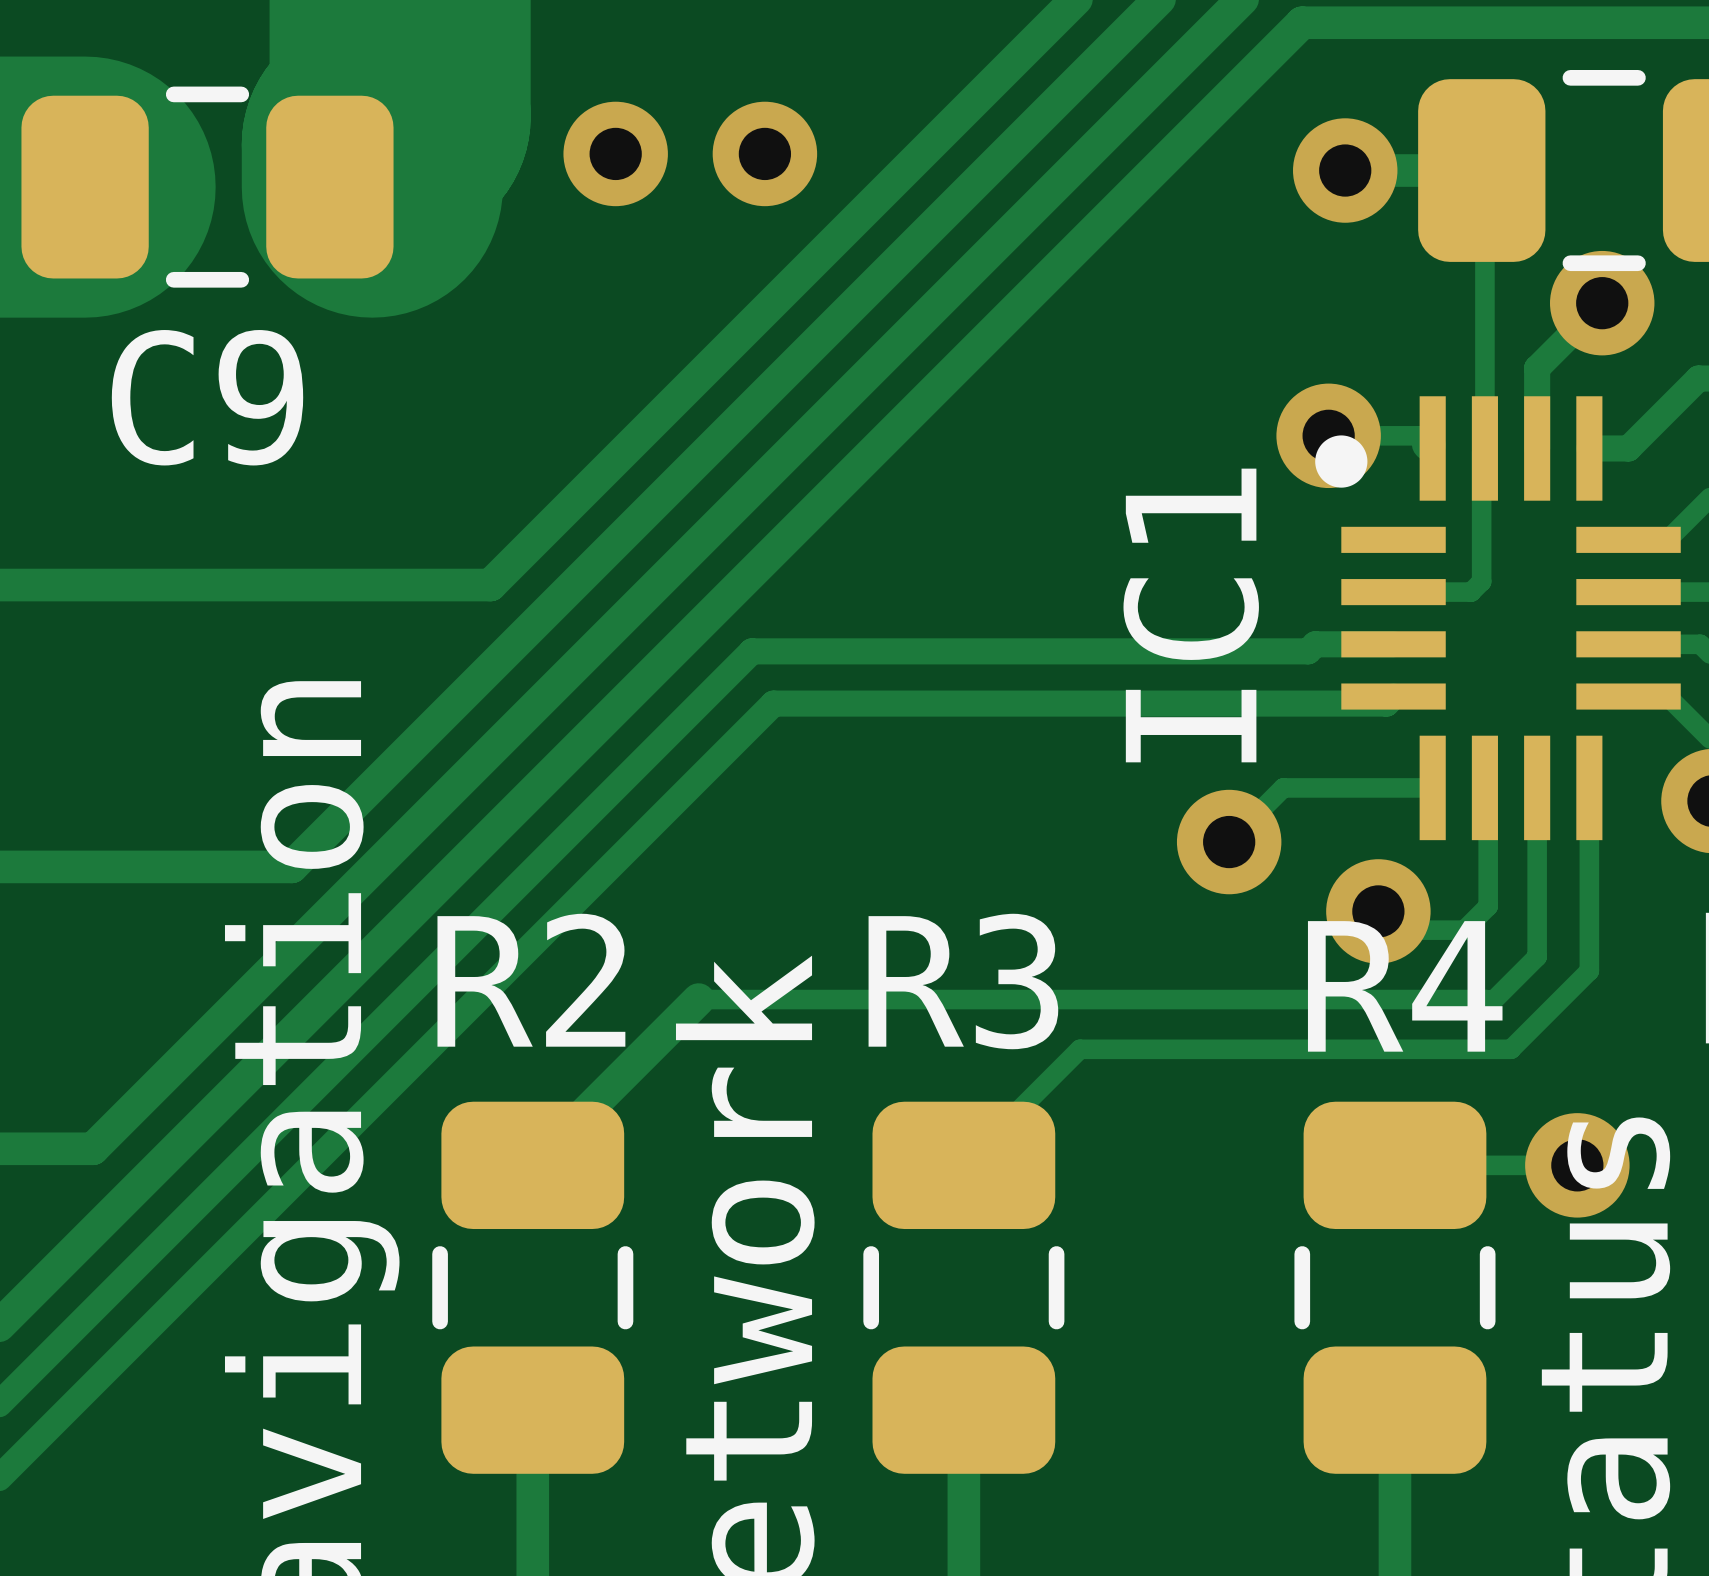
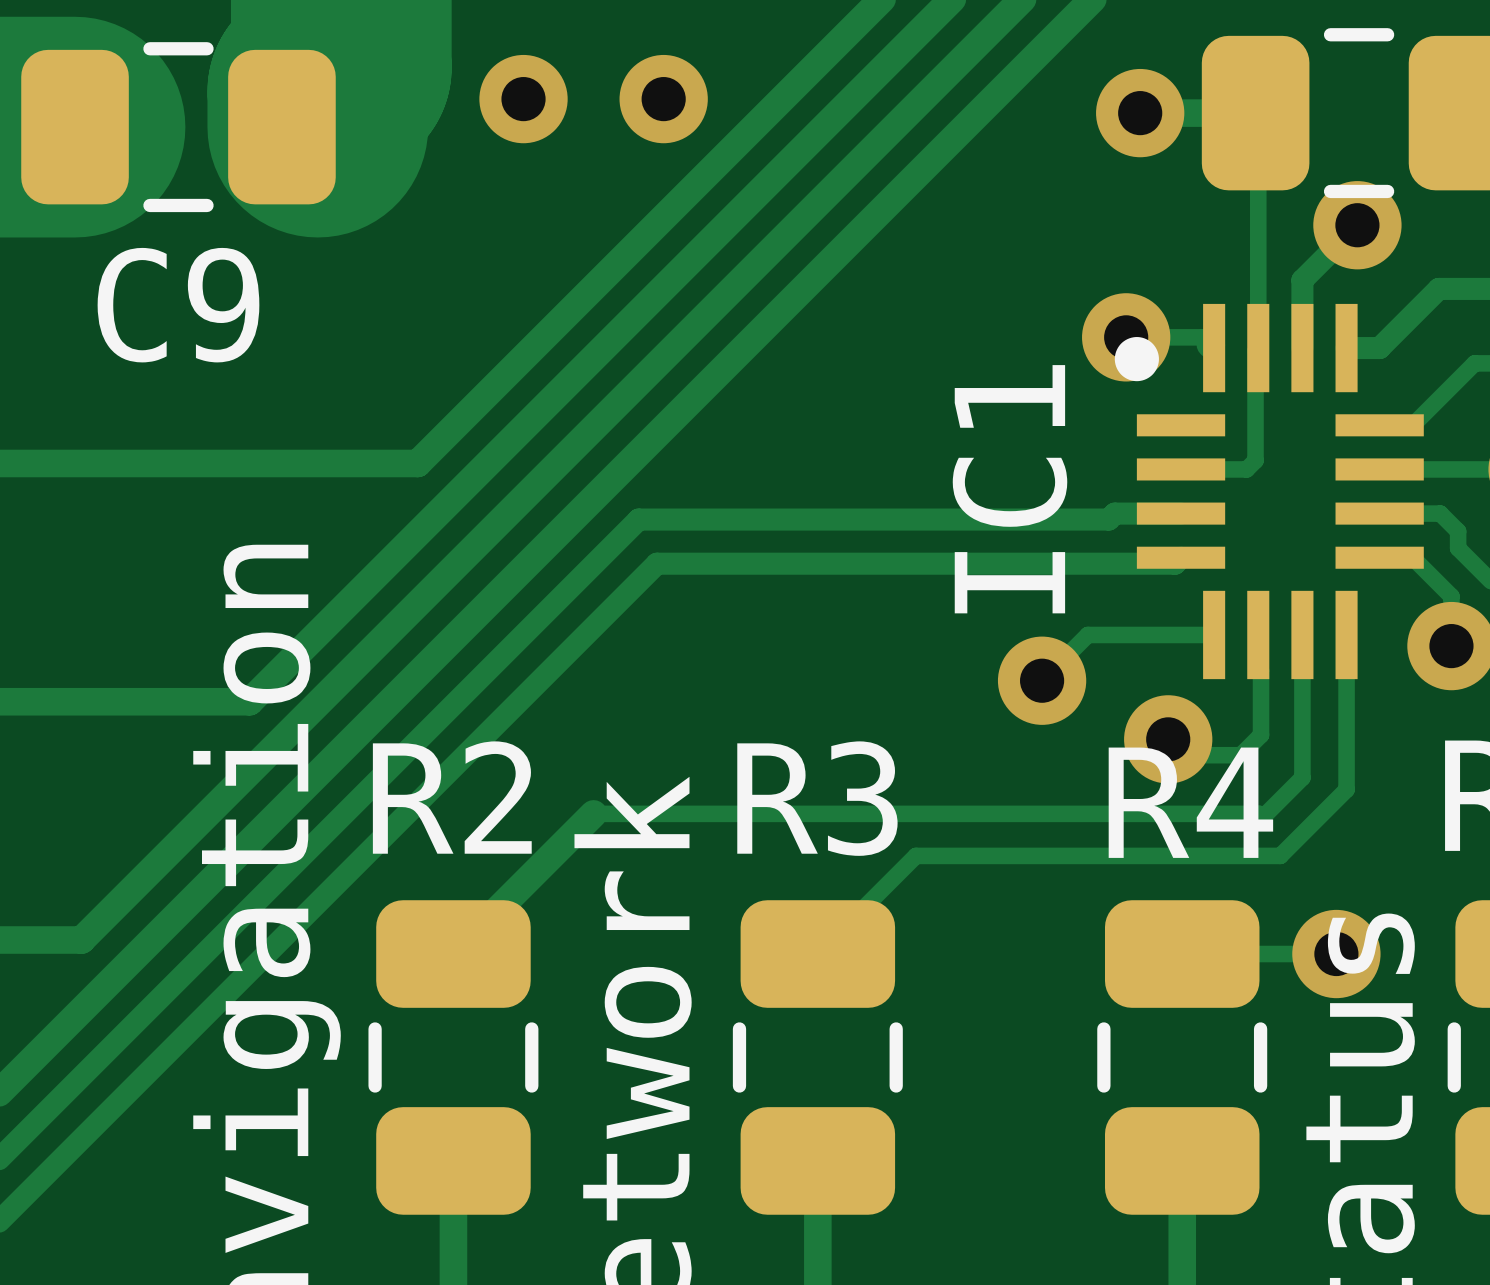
via position: (764, 153) -> (663, 99)

